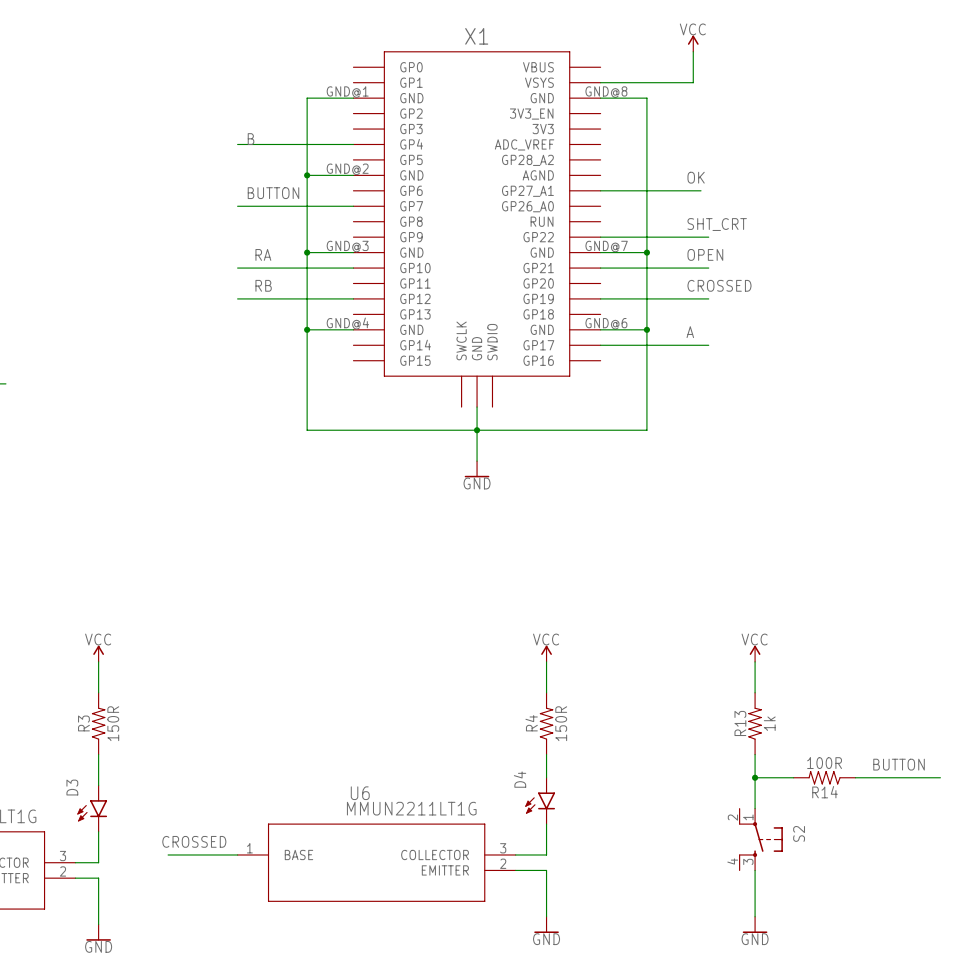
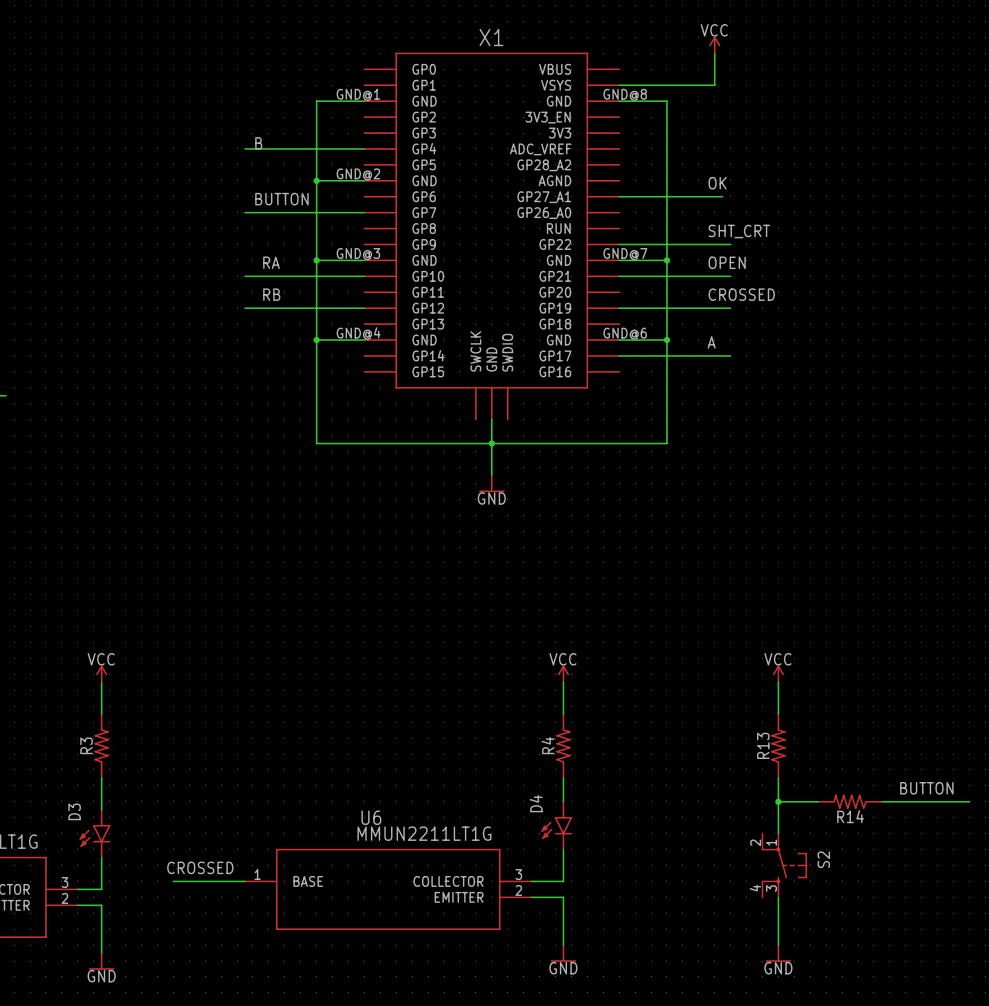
R3 value: 150R (113, 723) -> none
R4 value: 150R (561, 723) -> none
R13 value: 1k (769, 723) -> none
R14 value: 100R (824, 763) -> none

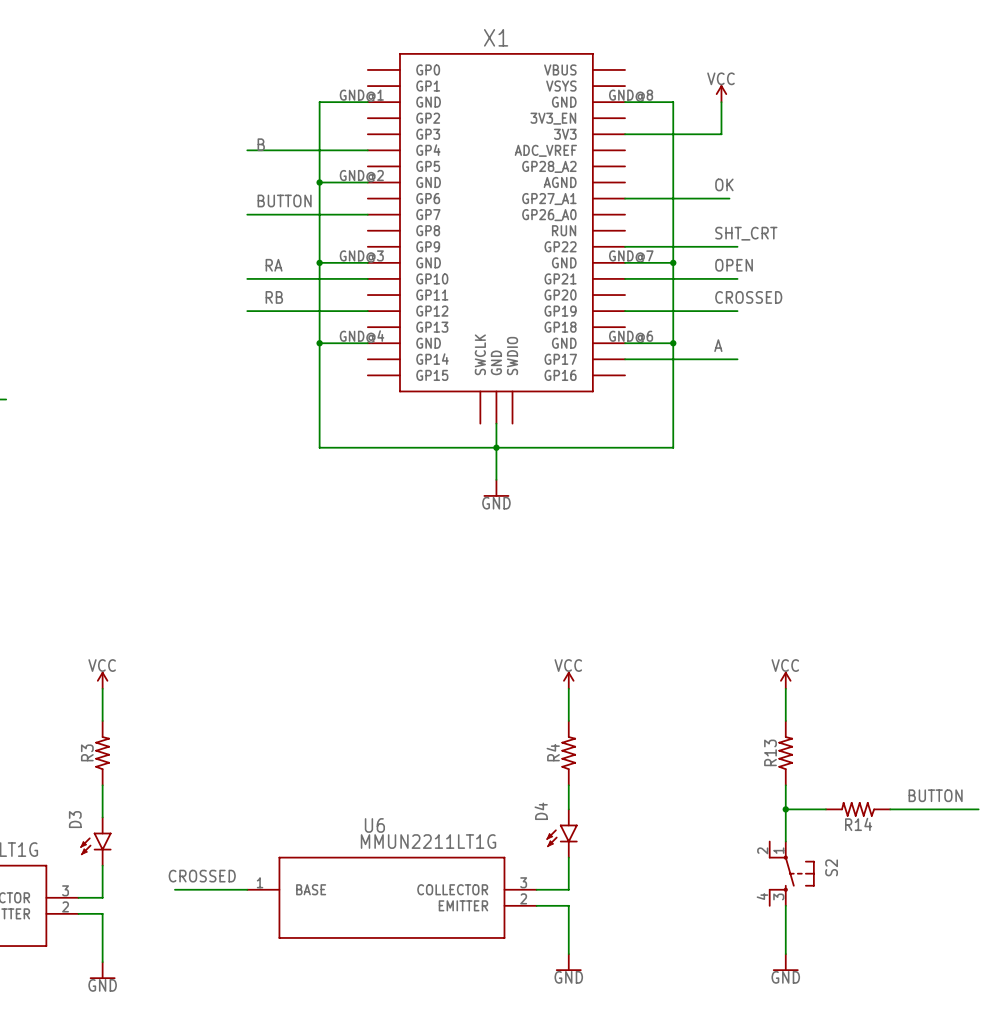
power symbol position: VCC (714, 45) -> VCC (721, 93)
wire: (714, 53) (714, 85) (619, 85) -> (721, 102) (721, 134) (625, 134)

